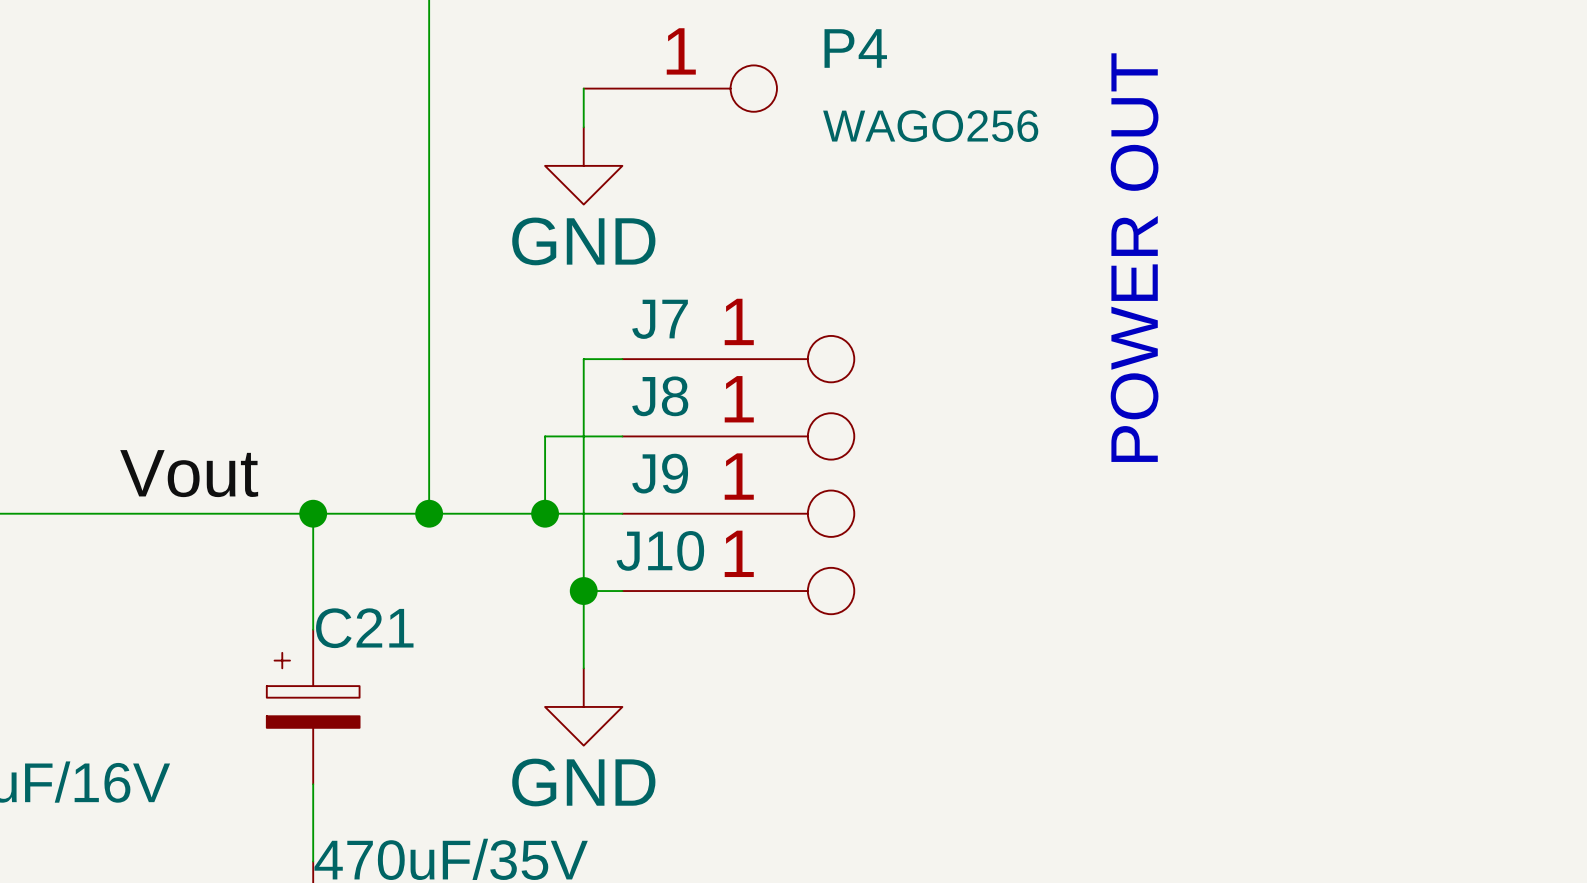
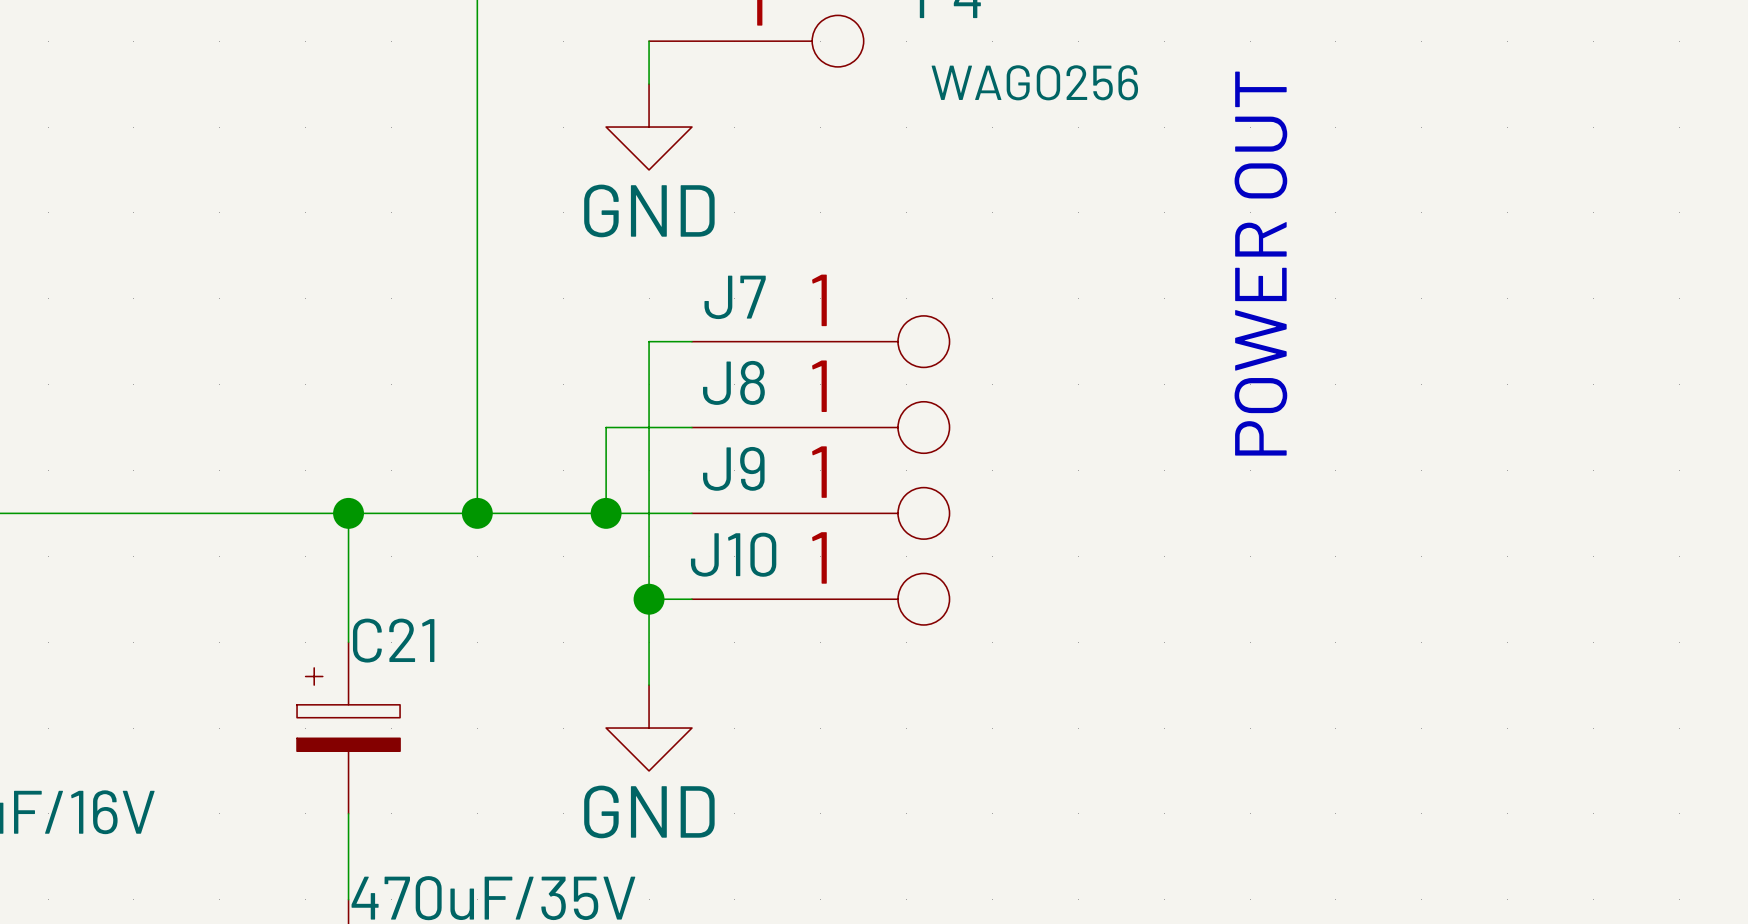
label: Vout (189, 473) -> none

